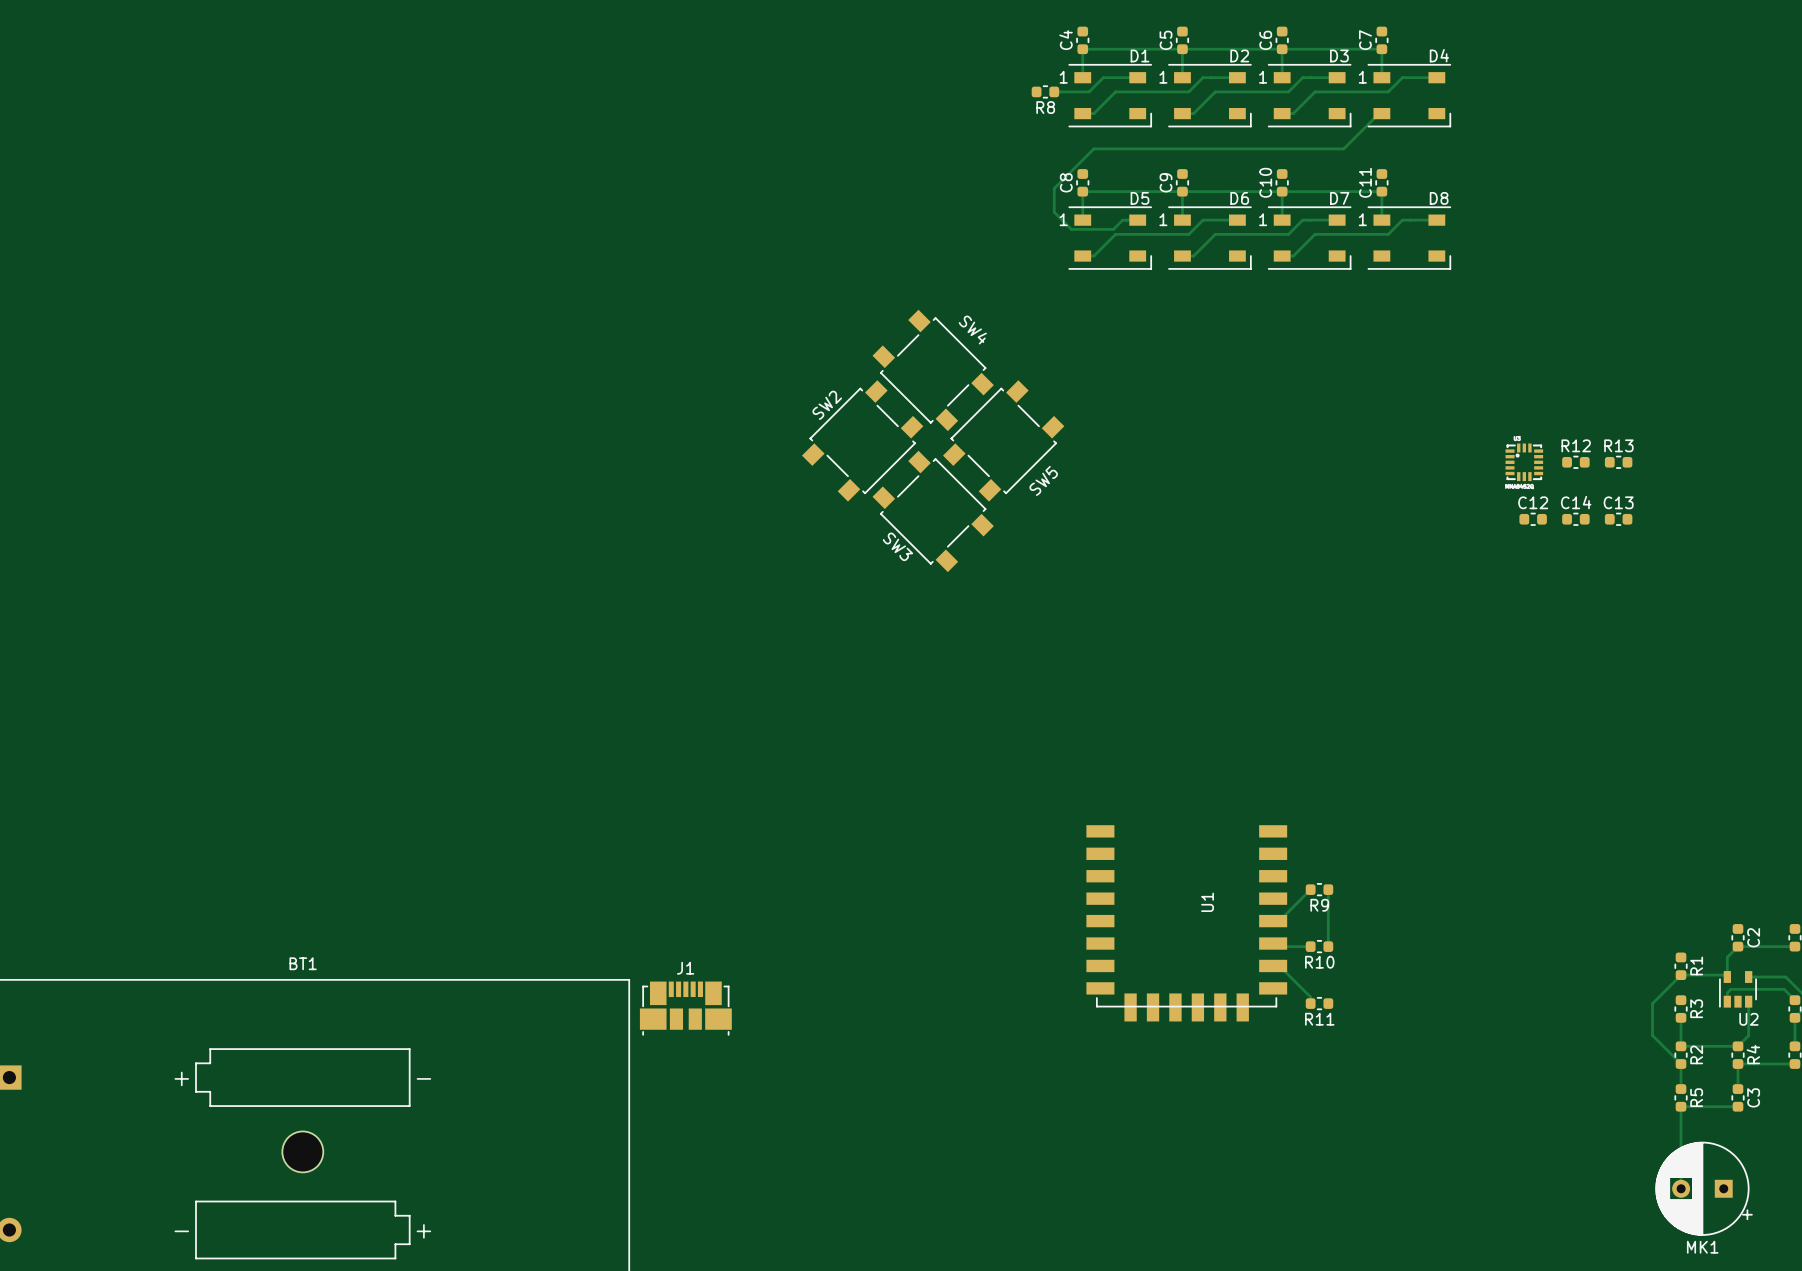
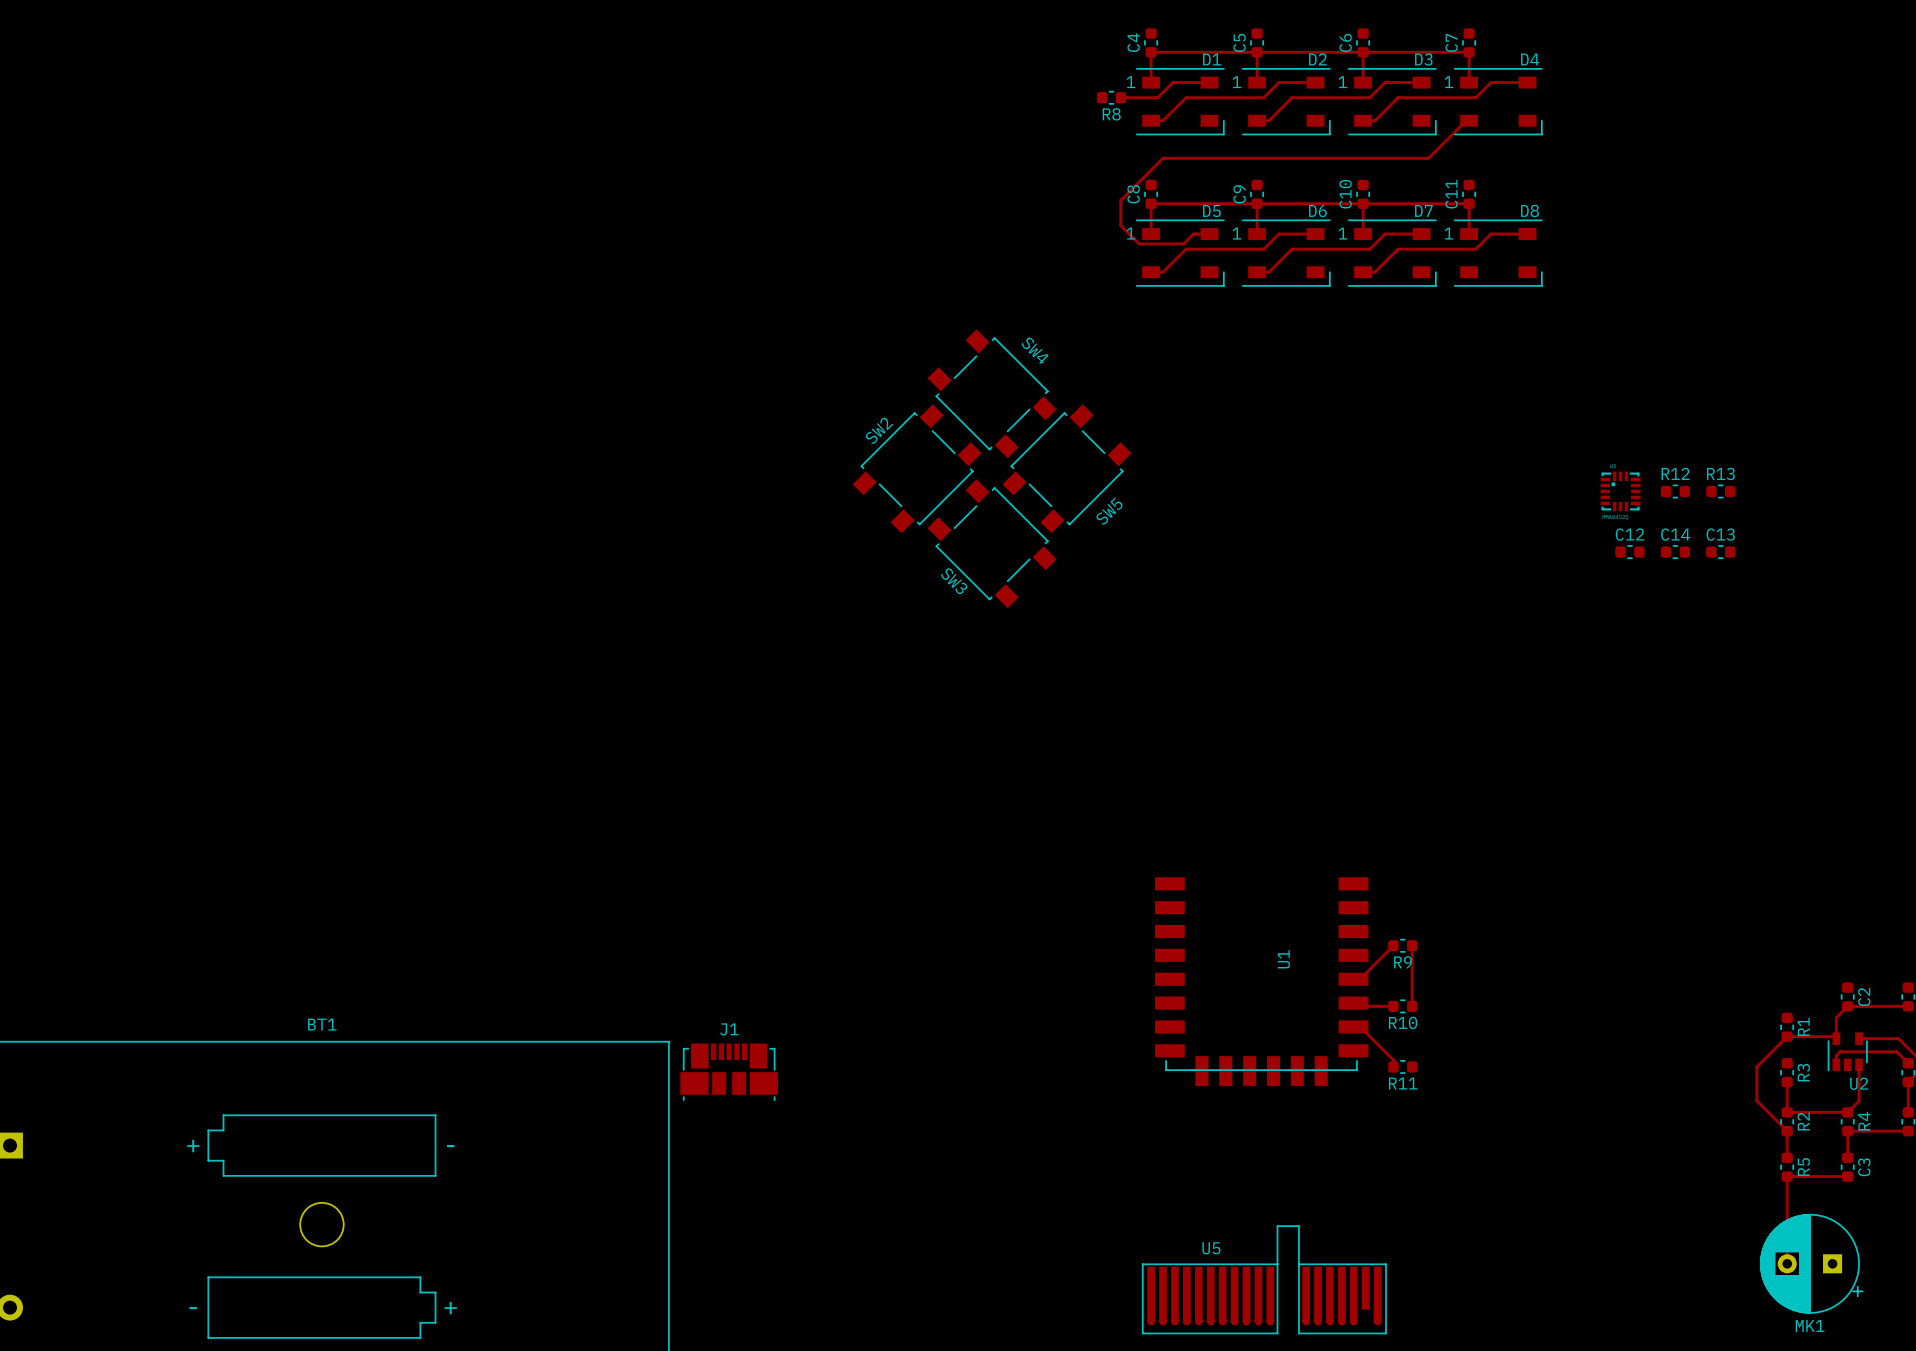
U5: none -> (1264, 1279)

